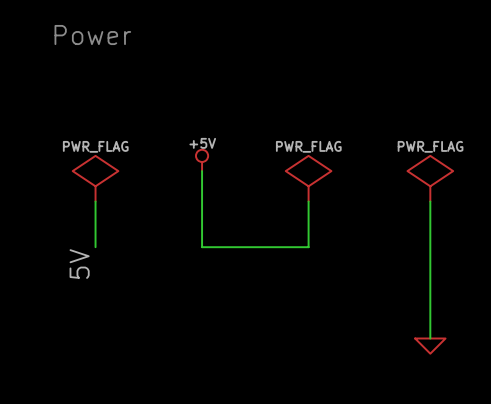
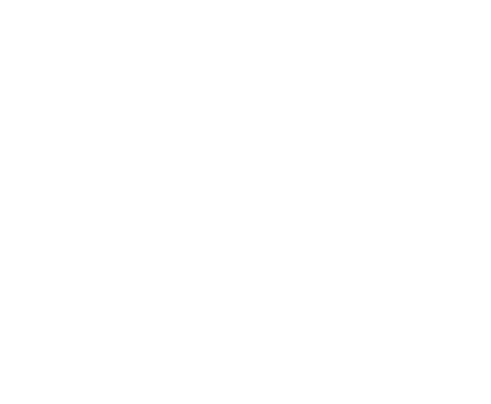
text: Power (92, 34) -> none
power symbol: +5V (202, 160) -> none
wire: (202, 171) (202, 247) (308, 247) (308, 201) -> none
power symbol: PWR_FLAG (95, 178) -> none
power symbol: PWR_FLAG (308, 178) -> none
power symbol: PWR_FLAG (430, 178) -> none
wire: (95, 201) (95, 247) -> none
wire: (430, 201) (430, 338) -> none
label: 5V (79, 264) -> none
power symbol: (430, 346) -> none

